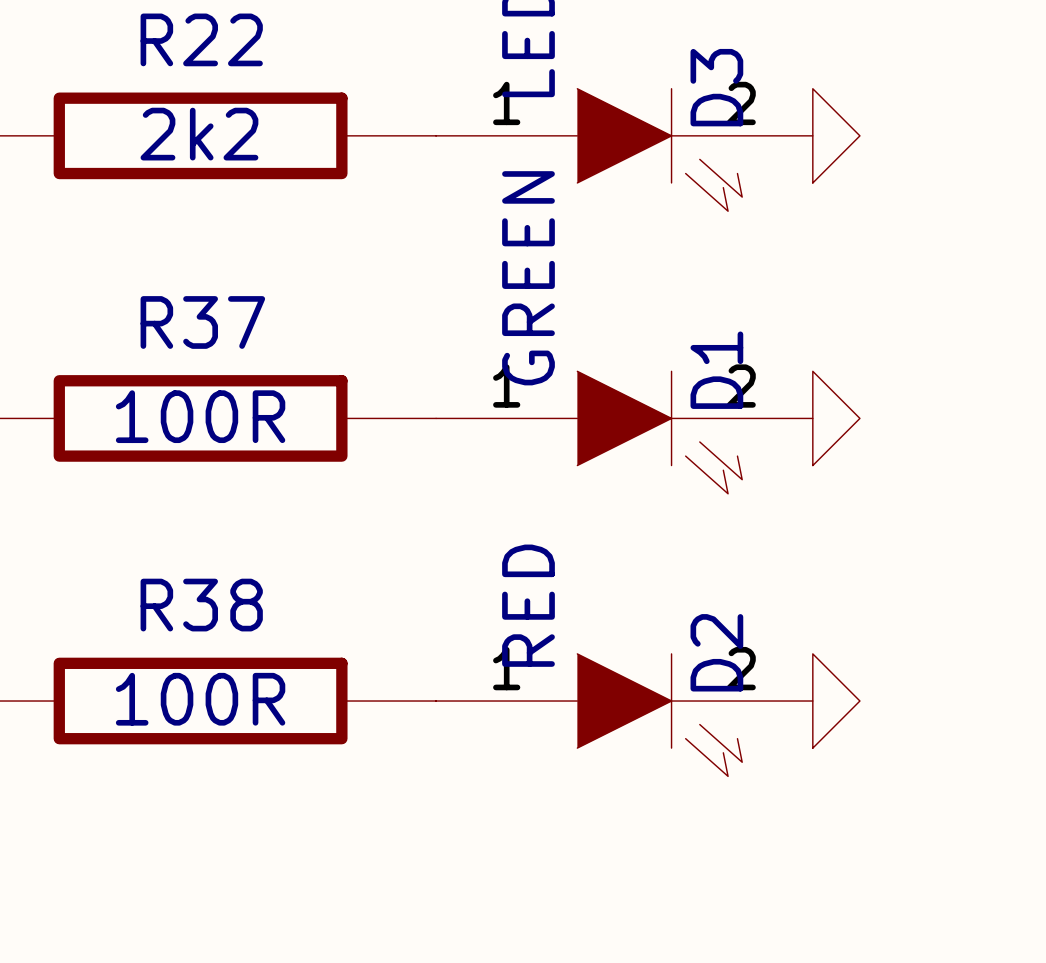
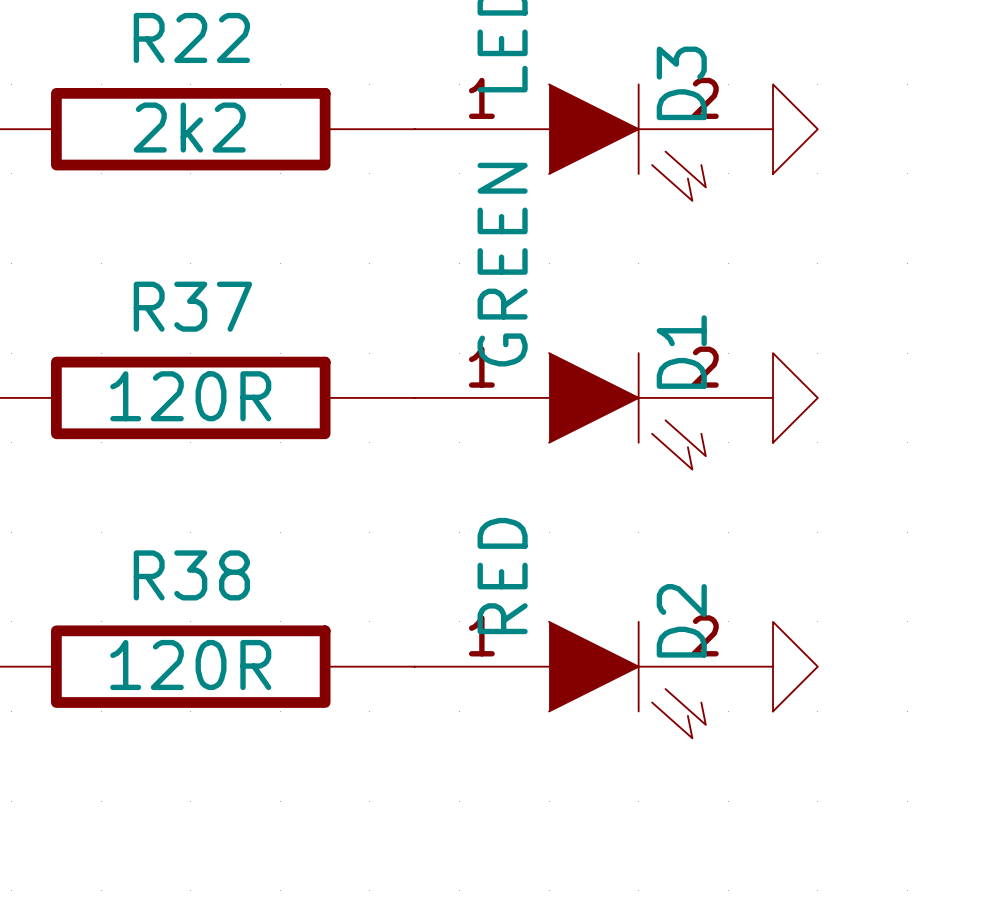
R37 value: 100R (200, 416) -> 120R (190, 396)
R38 value: 100R (200, 699) -> 120R (190, 664)

